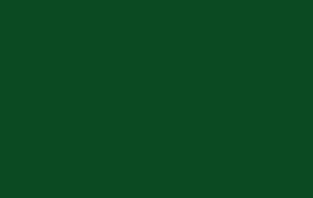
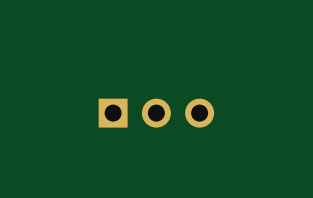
part: none -> (156, 113)

